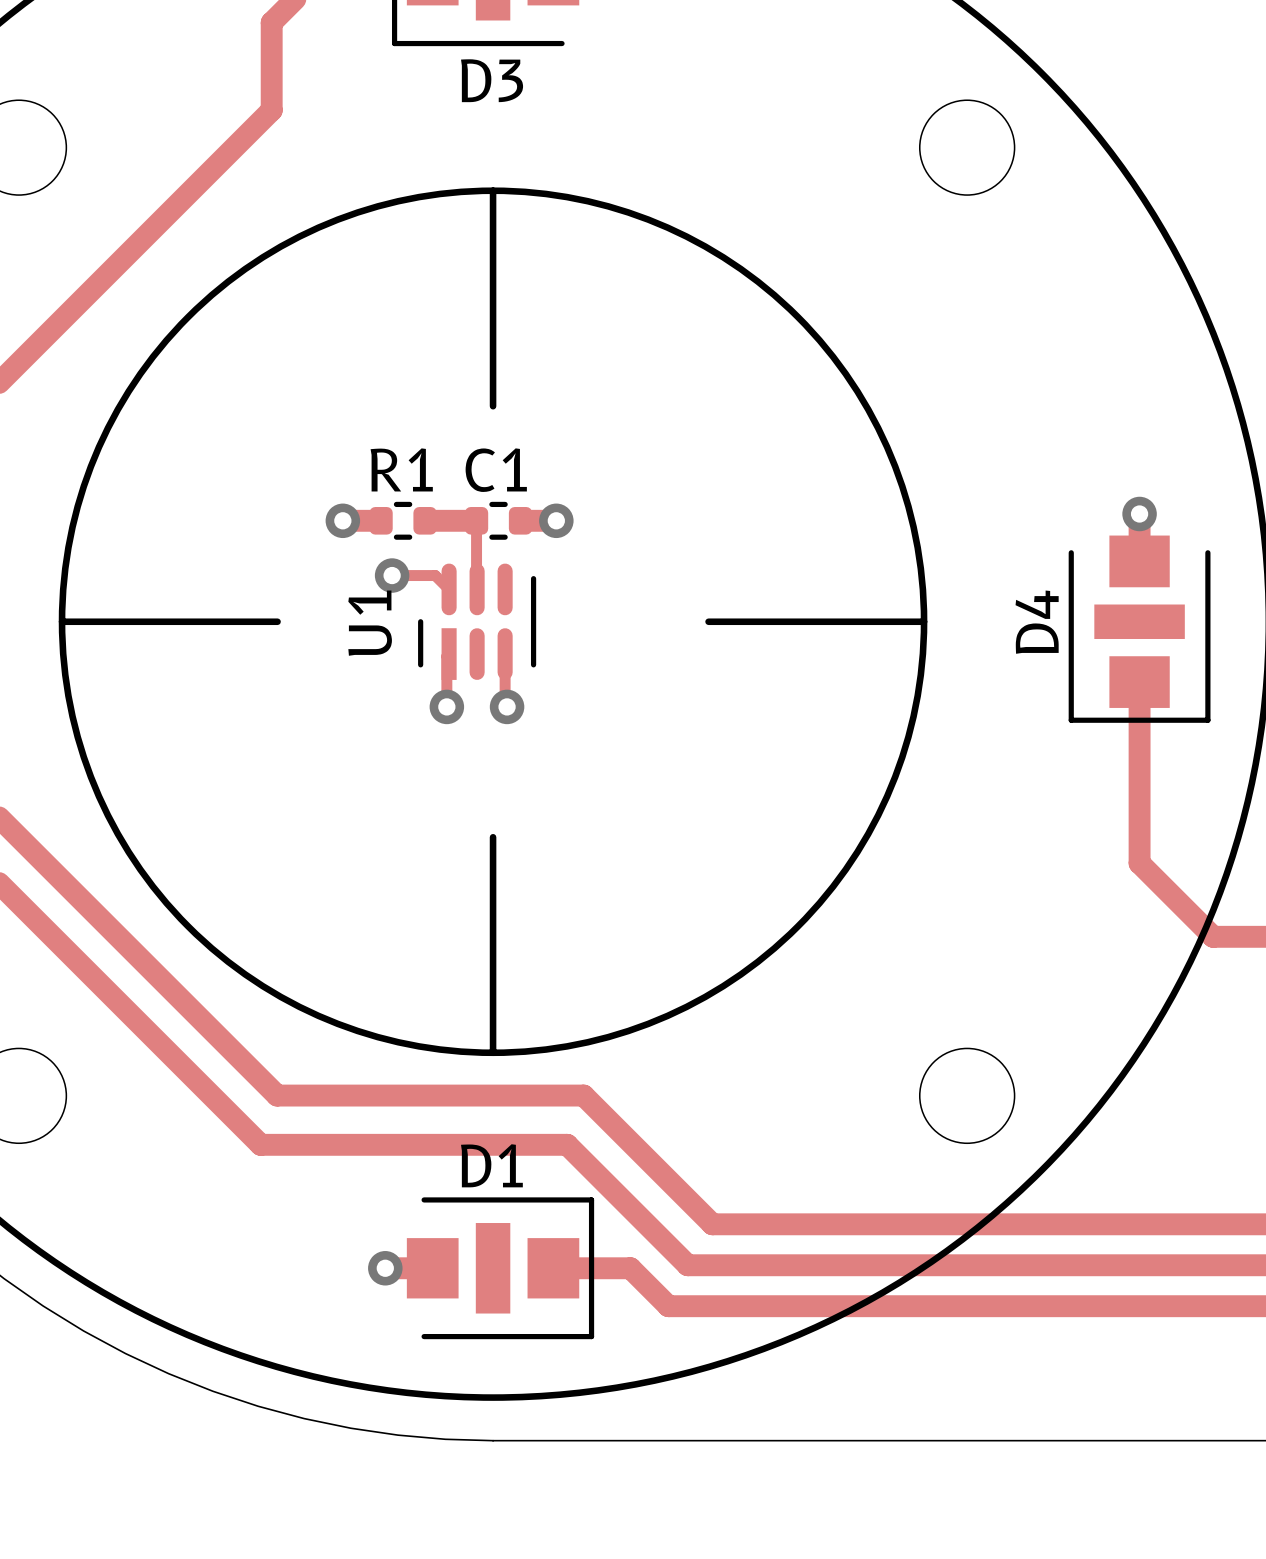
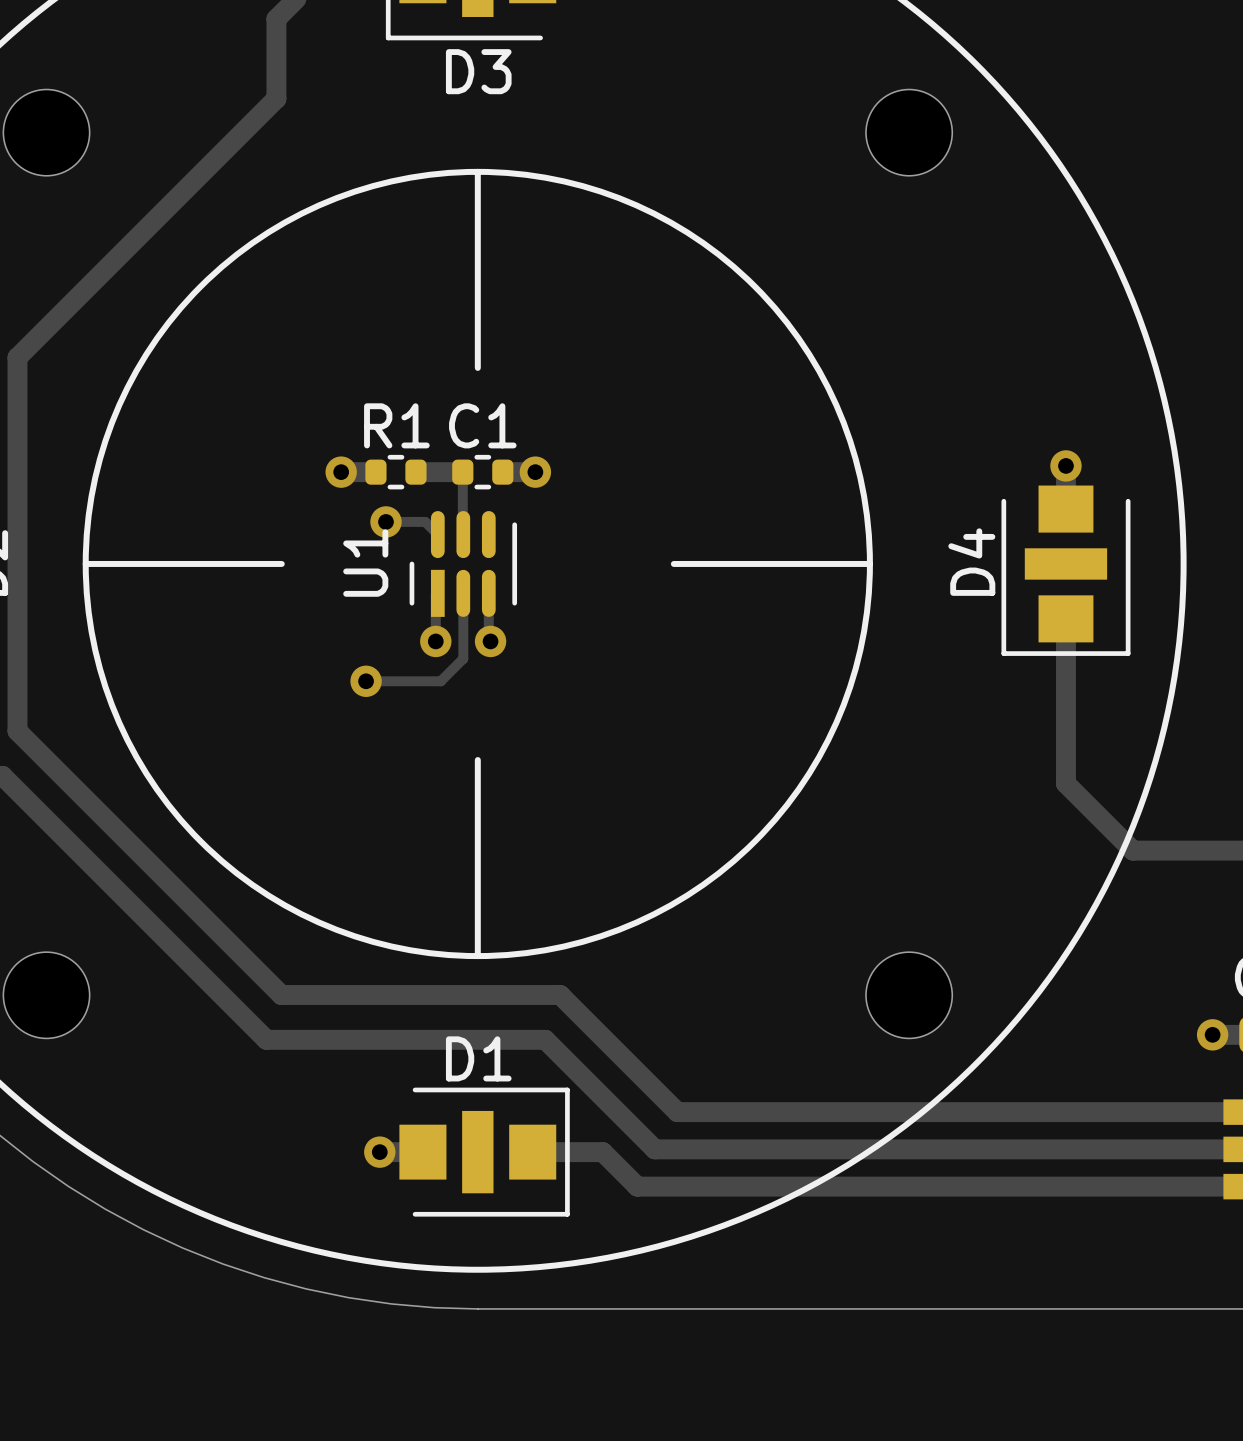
track: none -> (463, 593) (463, 658) (440, 681) (366, 681)
via: none -> (366, 681)

